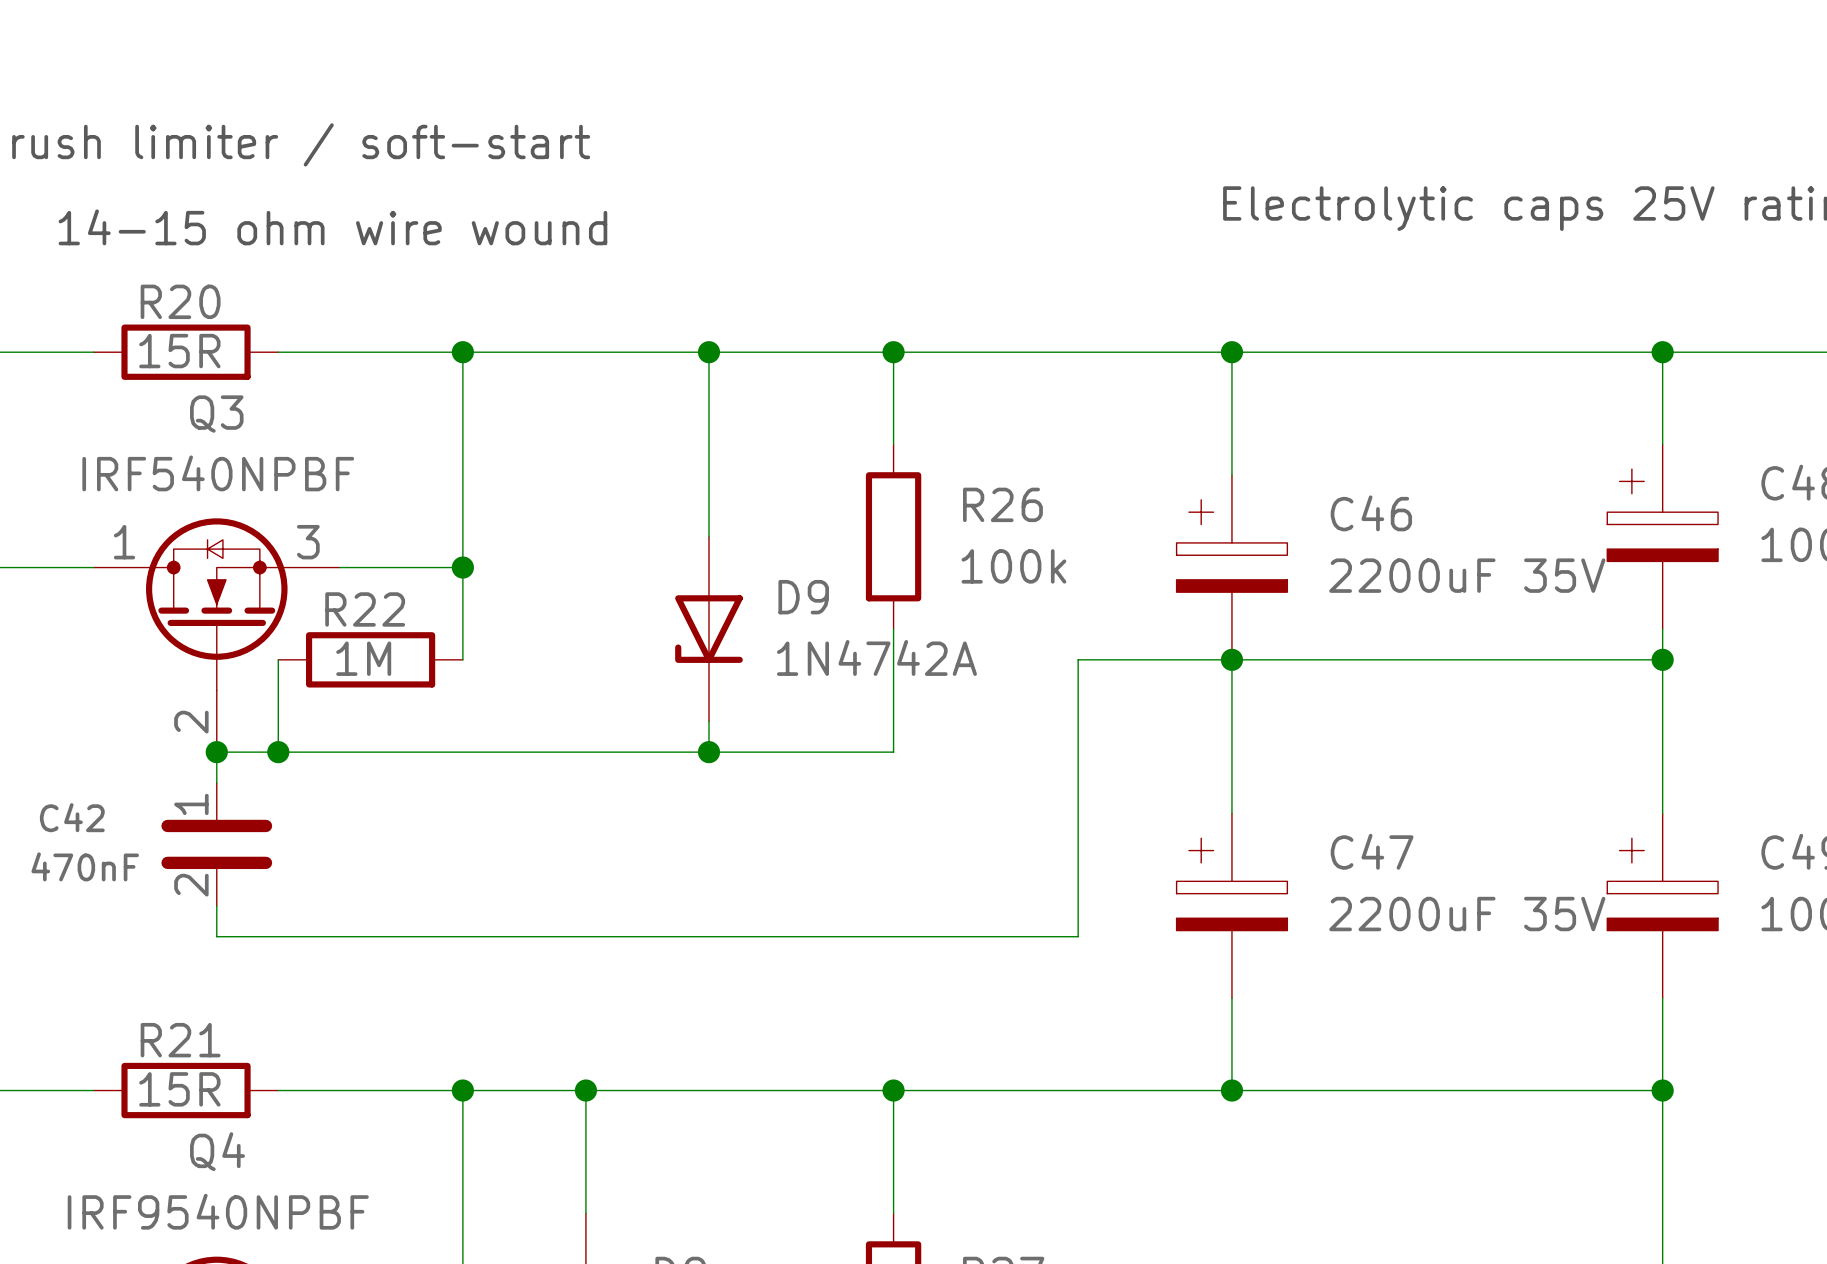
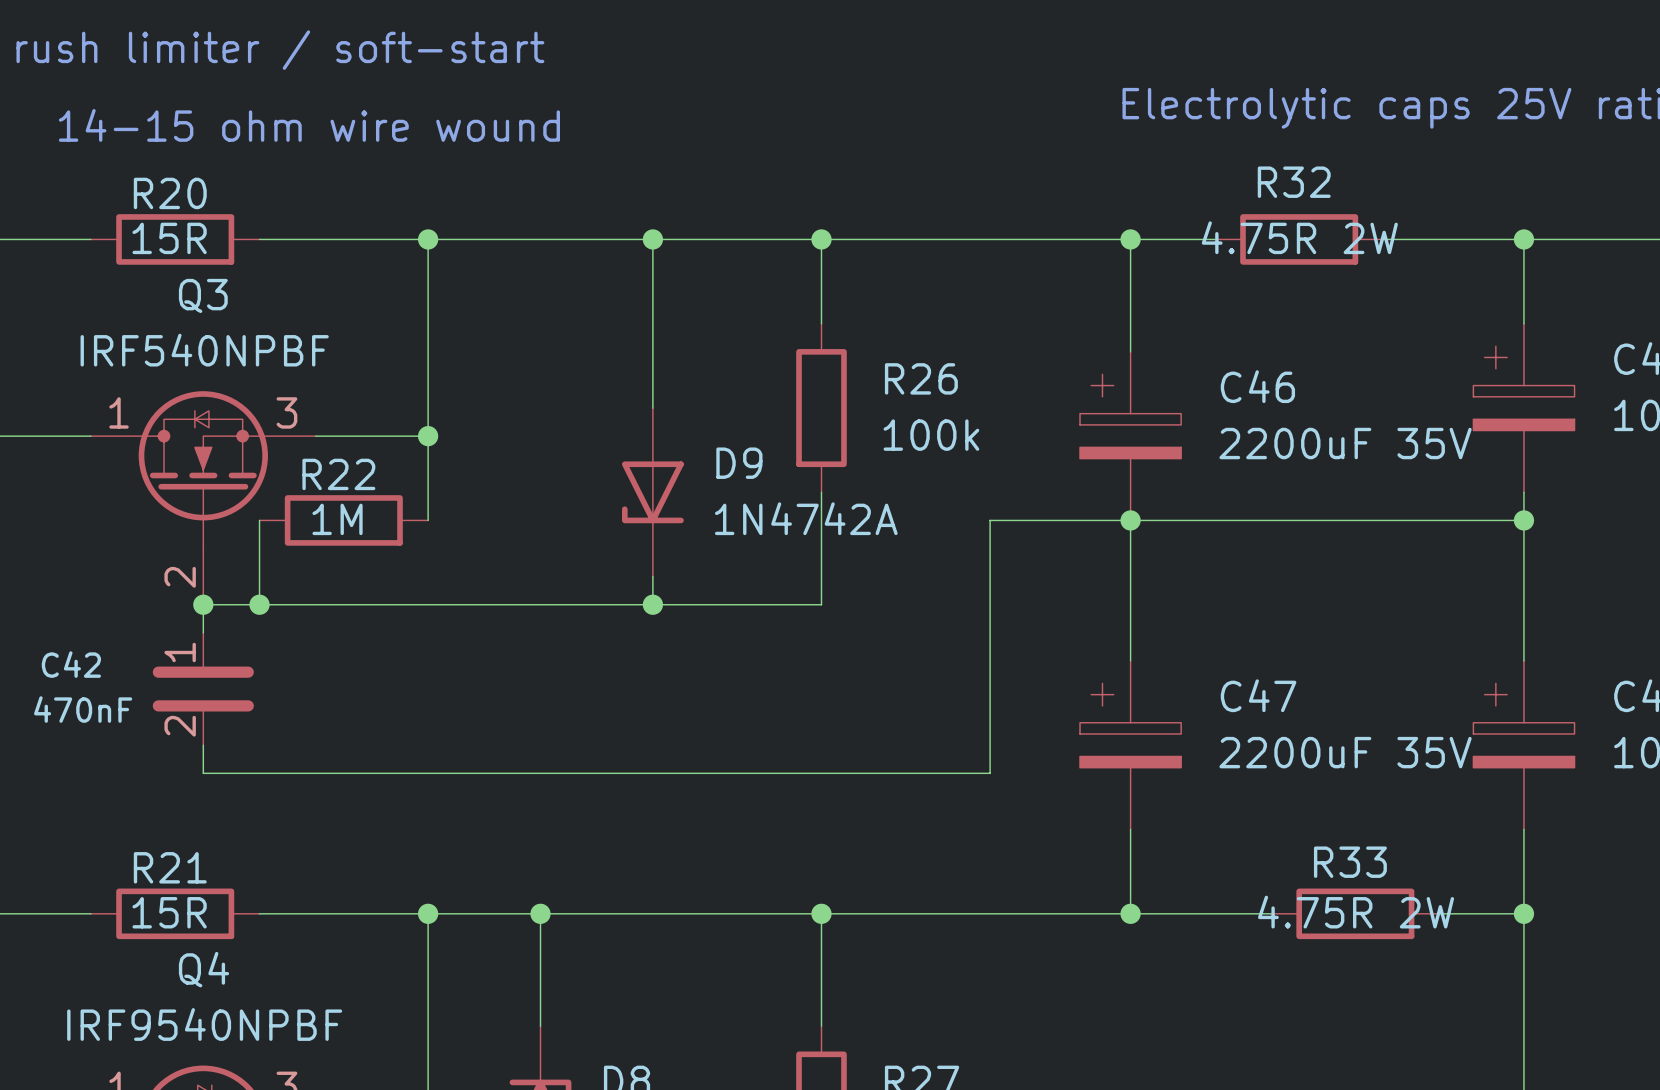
wire: (1324, 352) (1508, 352) -> none
R32: none -> 4.75R 2W (1299, 239)
wire: (1385, 1090) (1570, 1090) -> none
R33: none -> 4.75R 2W (1355, 913)

